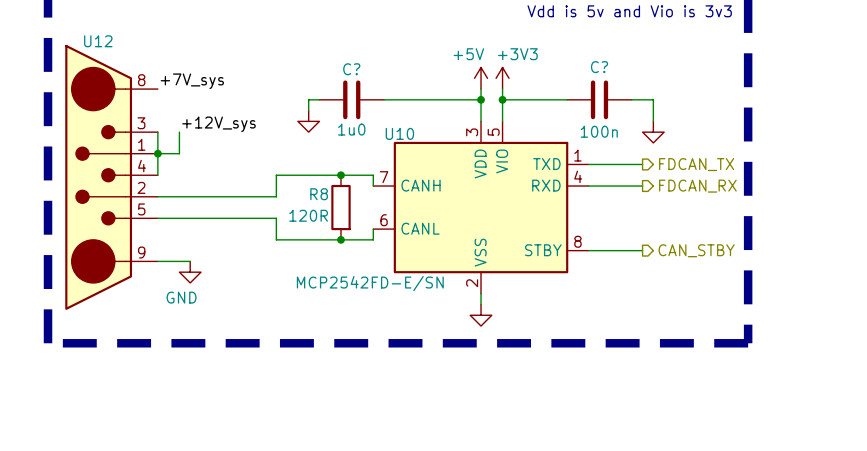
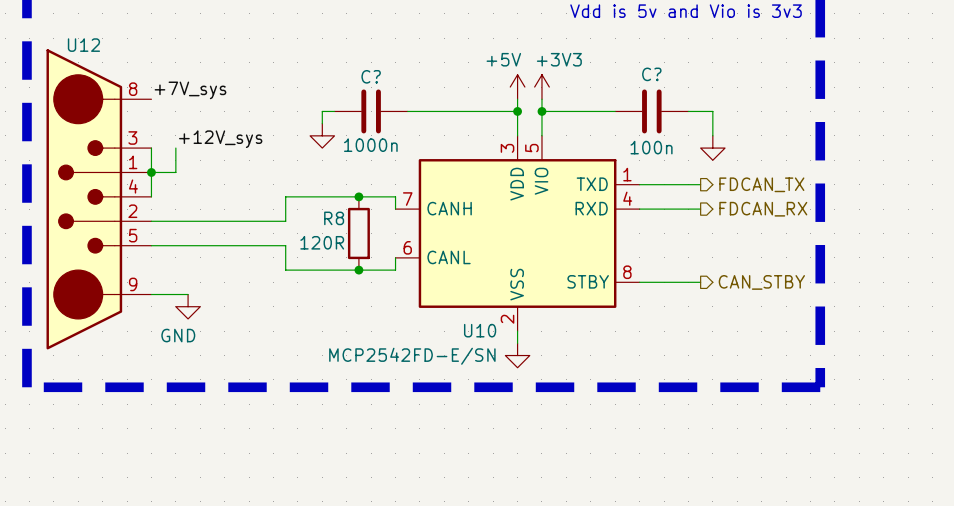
C? value: 1u0 (351, 129) -> 1000n (370, 145)
U10 name position: U10 (399, 133) -> U10 (480, 330)
U10 value position: MCP2542FD-E/SN (370, 283) -> MCP2542FD-E/SN (412, 356)

